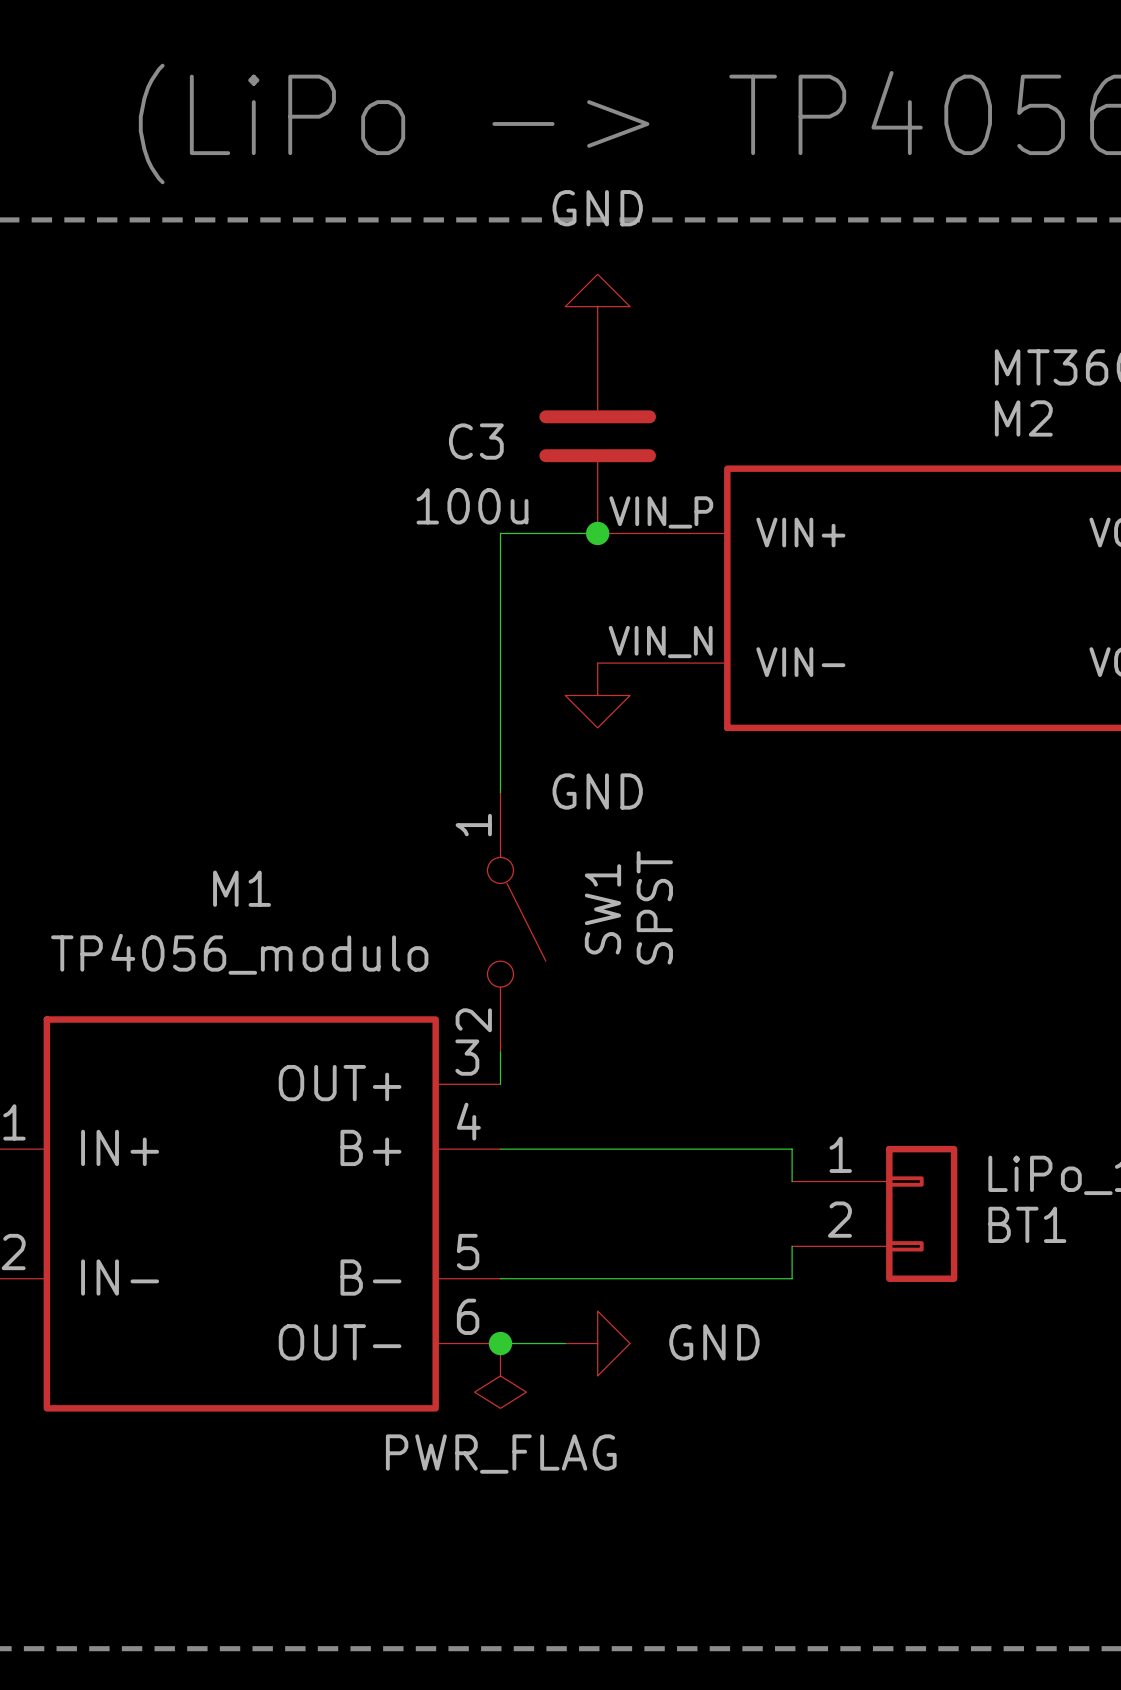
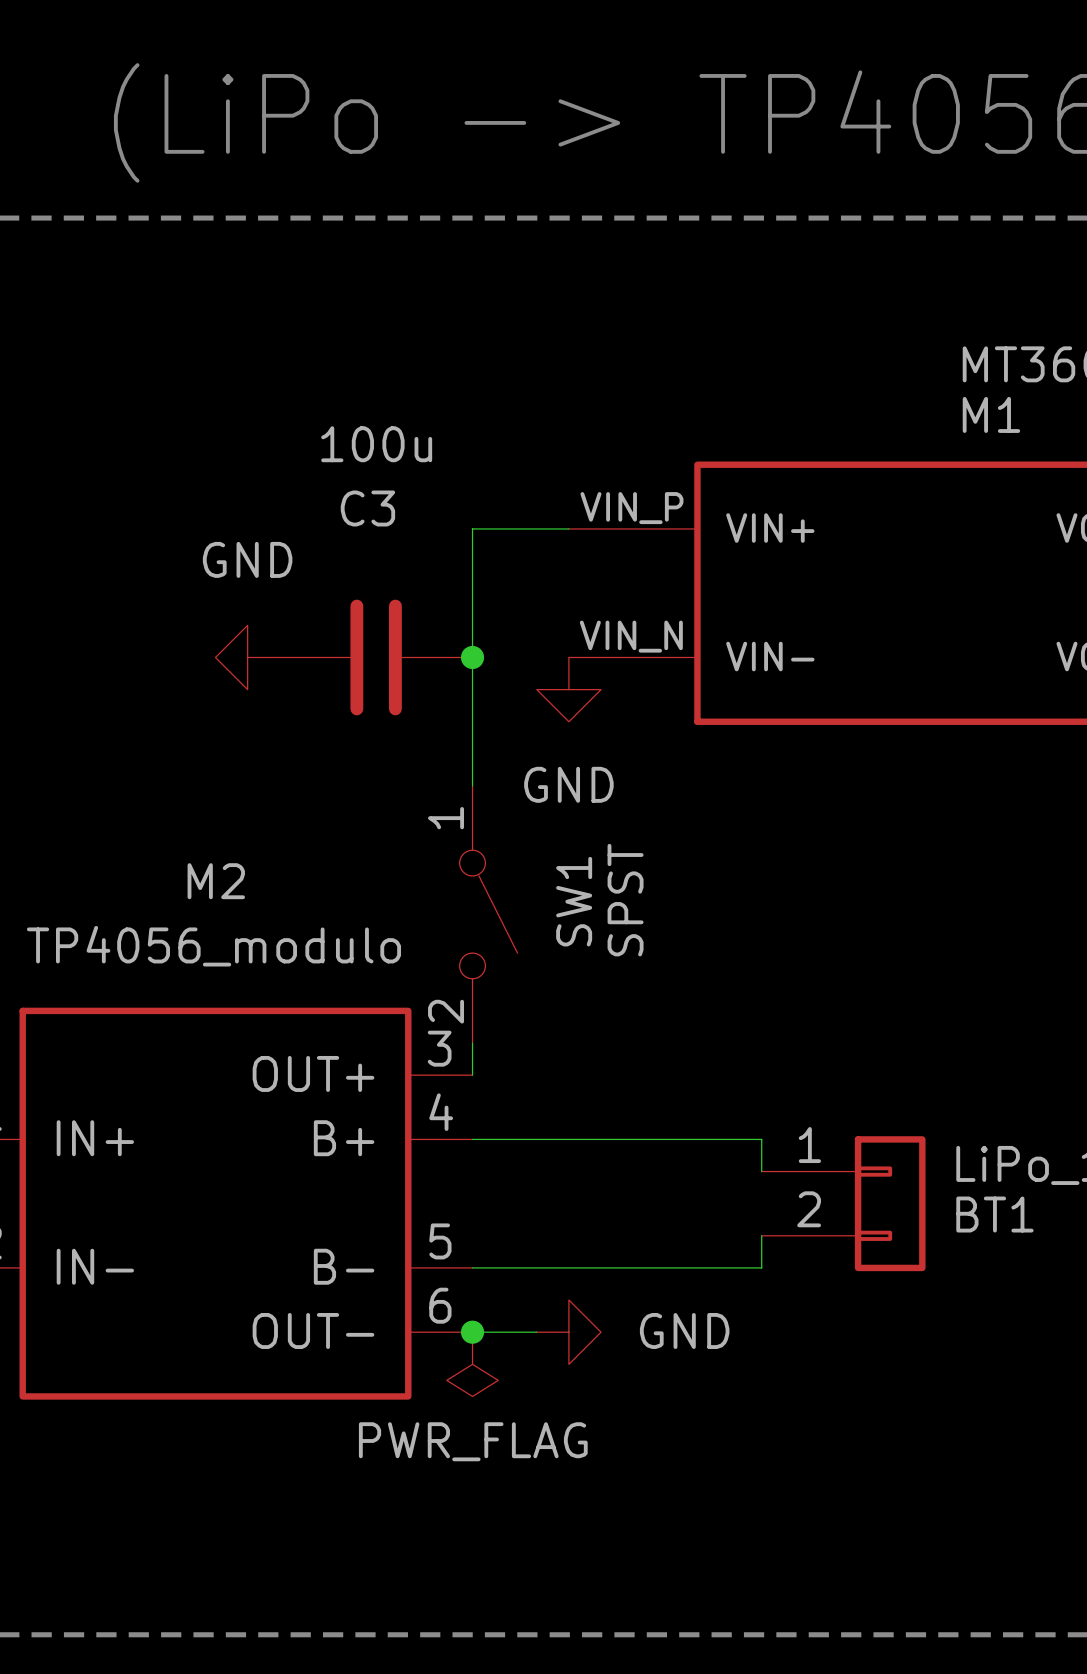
power symbol rotation: 0° (597, 306) -> 90° counterclockwise (247, 657)
power symbol position: GND (597, 306) -> GND (247, 657)
M2 name: M2 (1023, 418) -> M1 (991, 414)
C3 rotation: 0° (597, 436) -> 90° clockwise (376, 657)
C3 position: (597, 436) -> (376, 657)
C3 value position: 100u (472, 506) -> 100u (376, 444)
junction: (597, 533) -> none
junction: none -> (472, 657)
M1 name: M1 (242, 888) -> M2 (216, 881)

